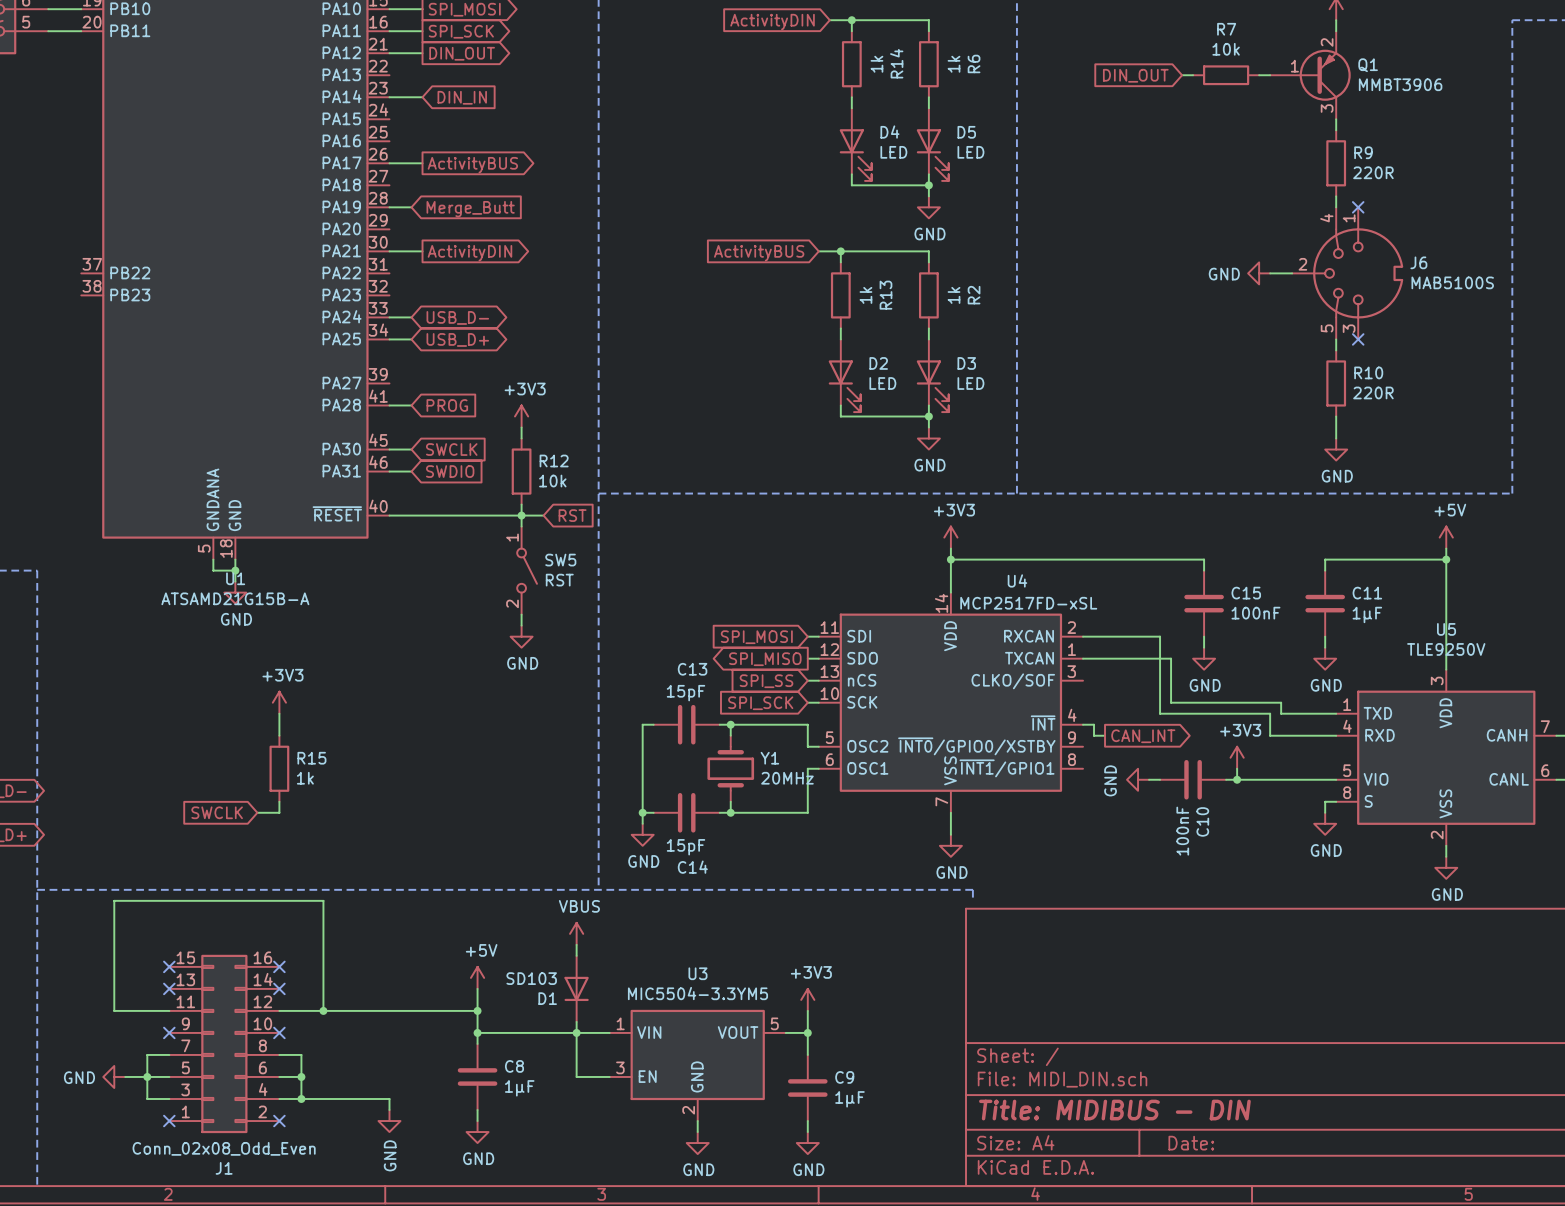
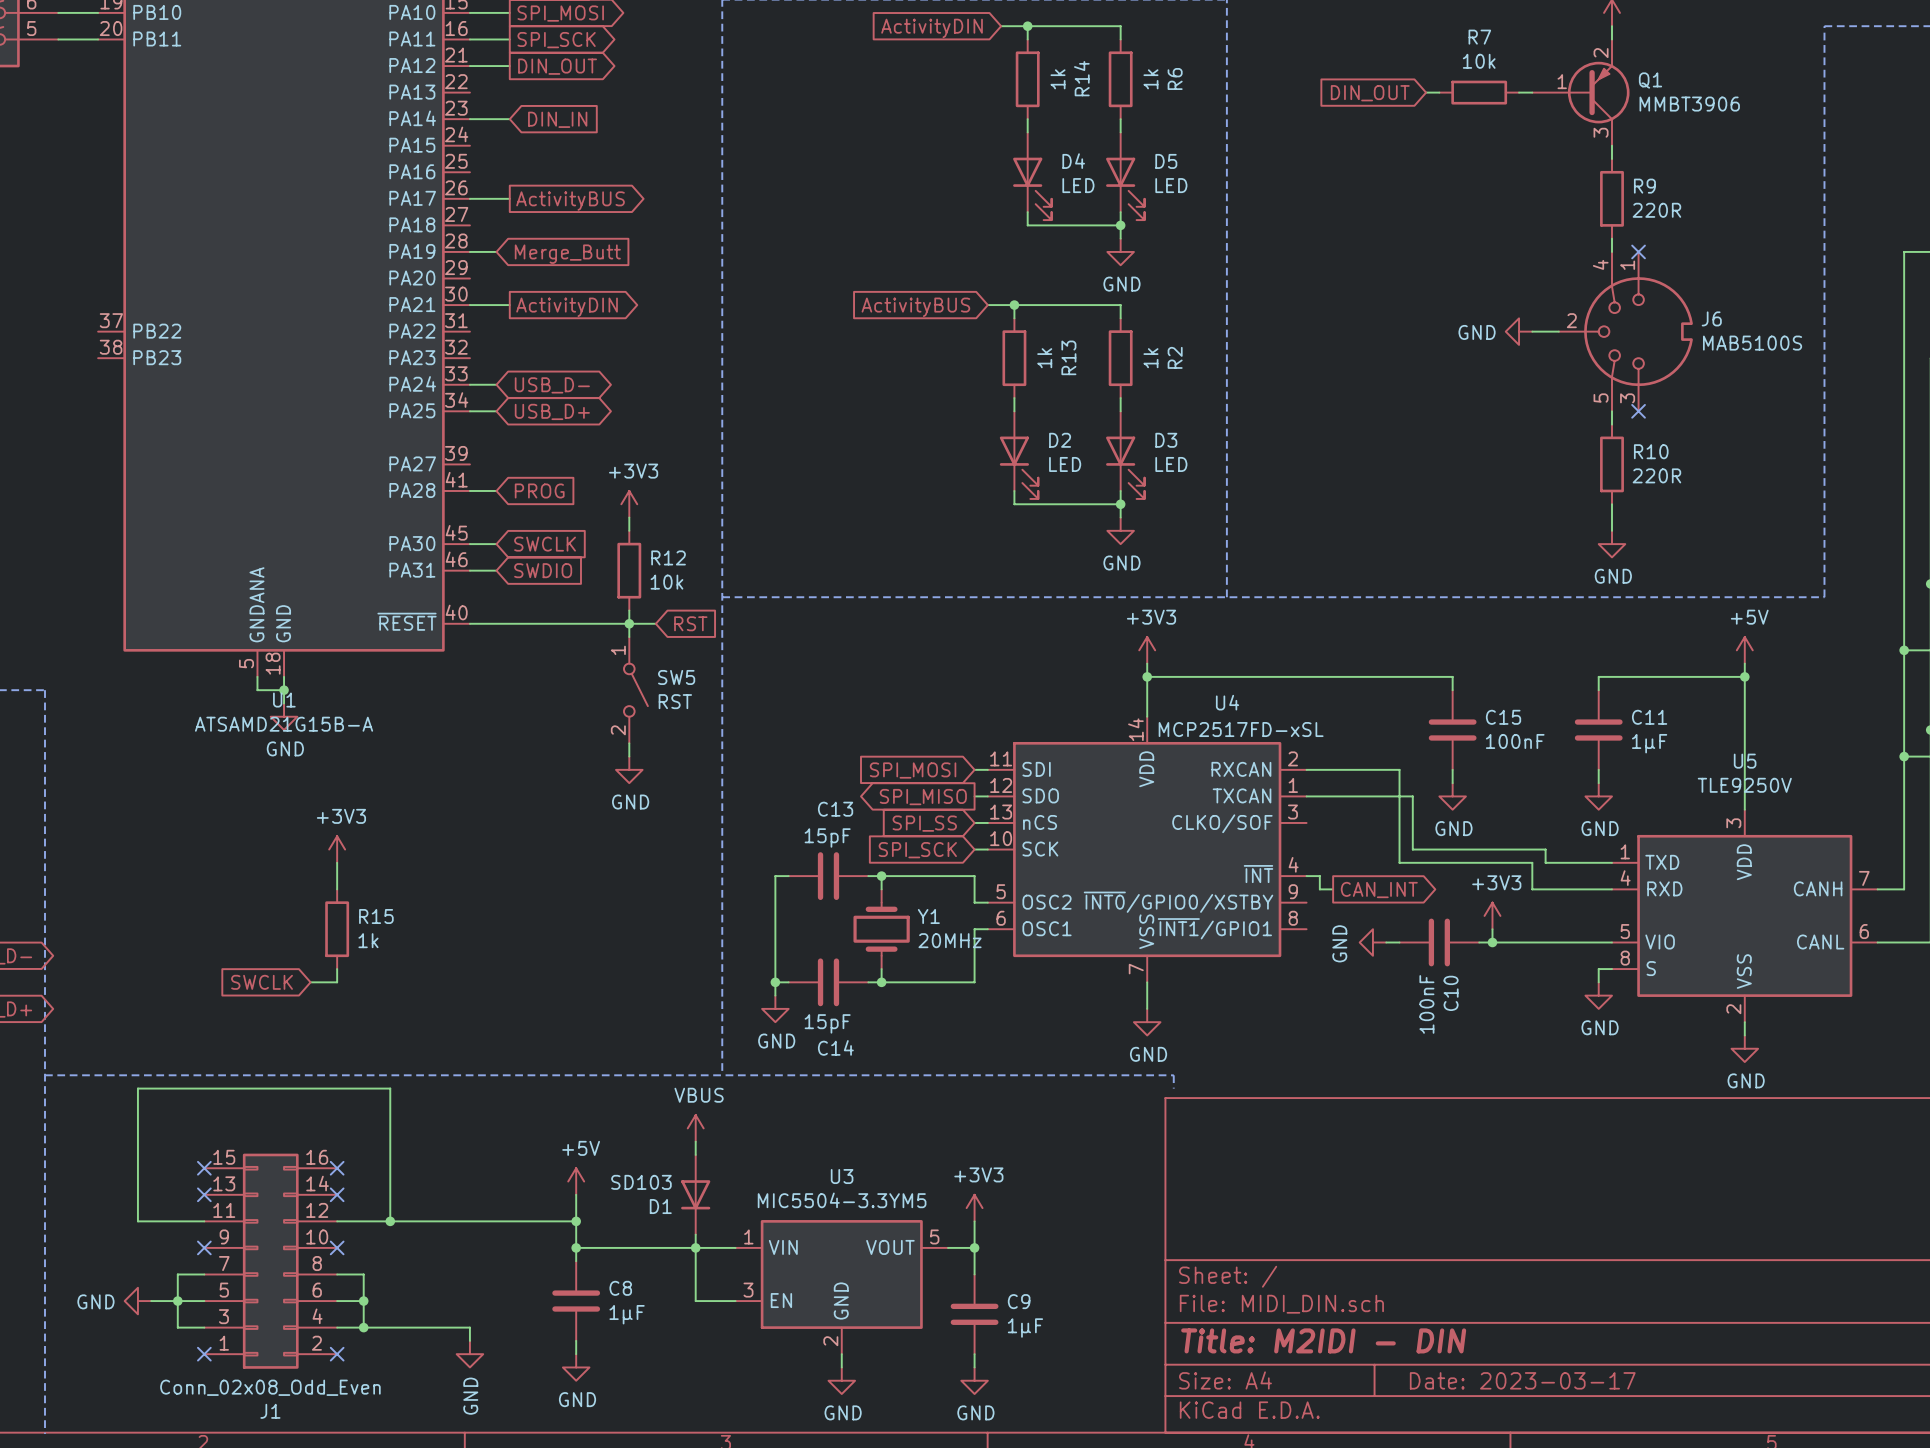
title block: Title: MIDIBUS - DIN (1114, 1110) -> Title: M2IDI - DIN (1323, 1340)
title block: Date: (1191, 1143) -> Date: 2023-03-17 (1522, 1380)

